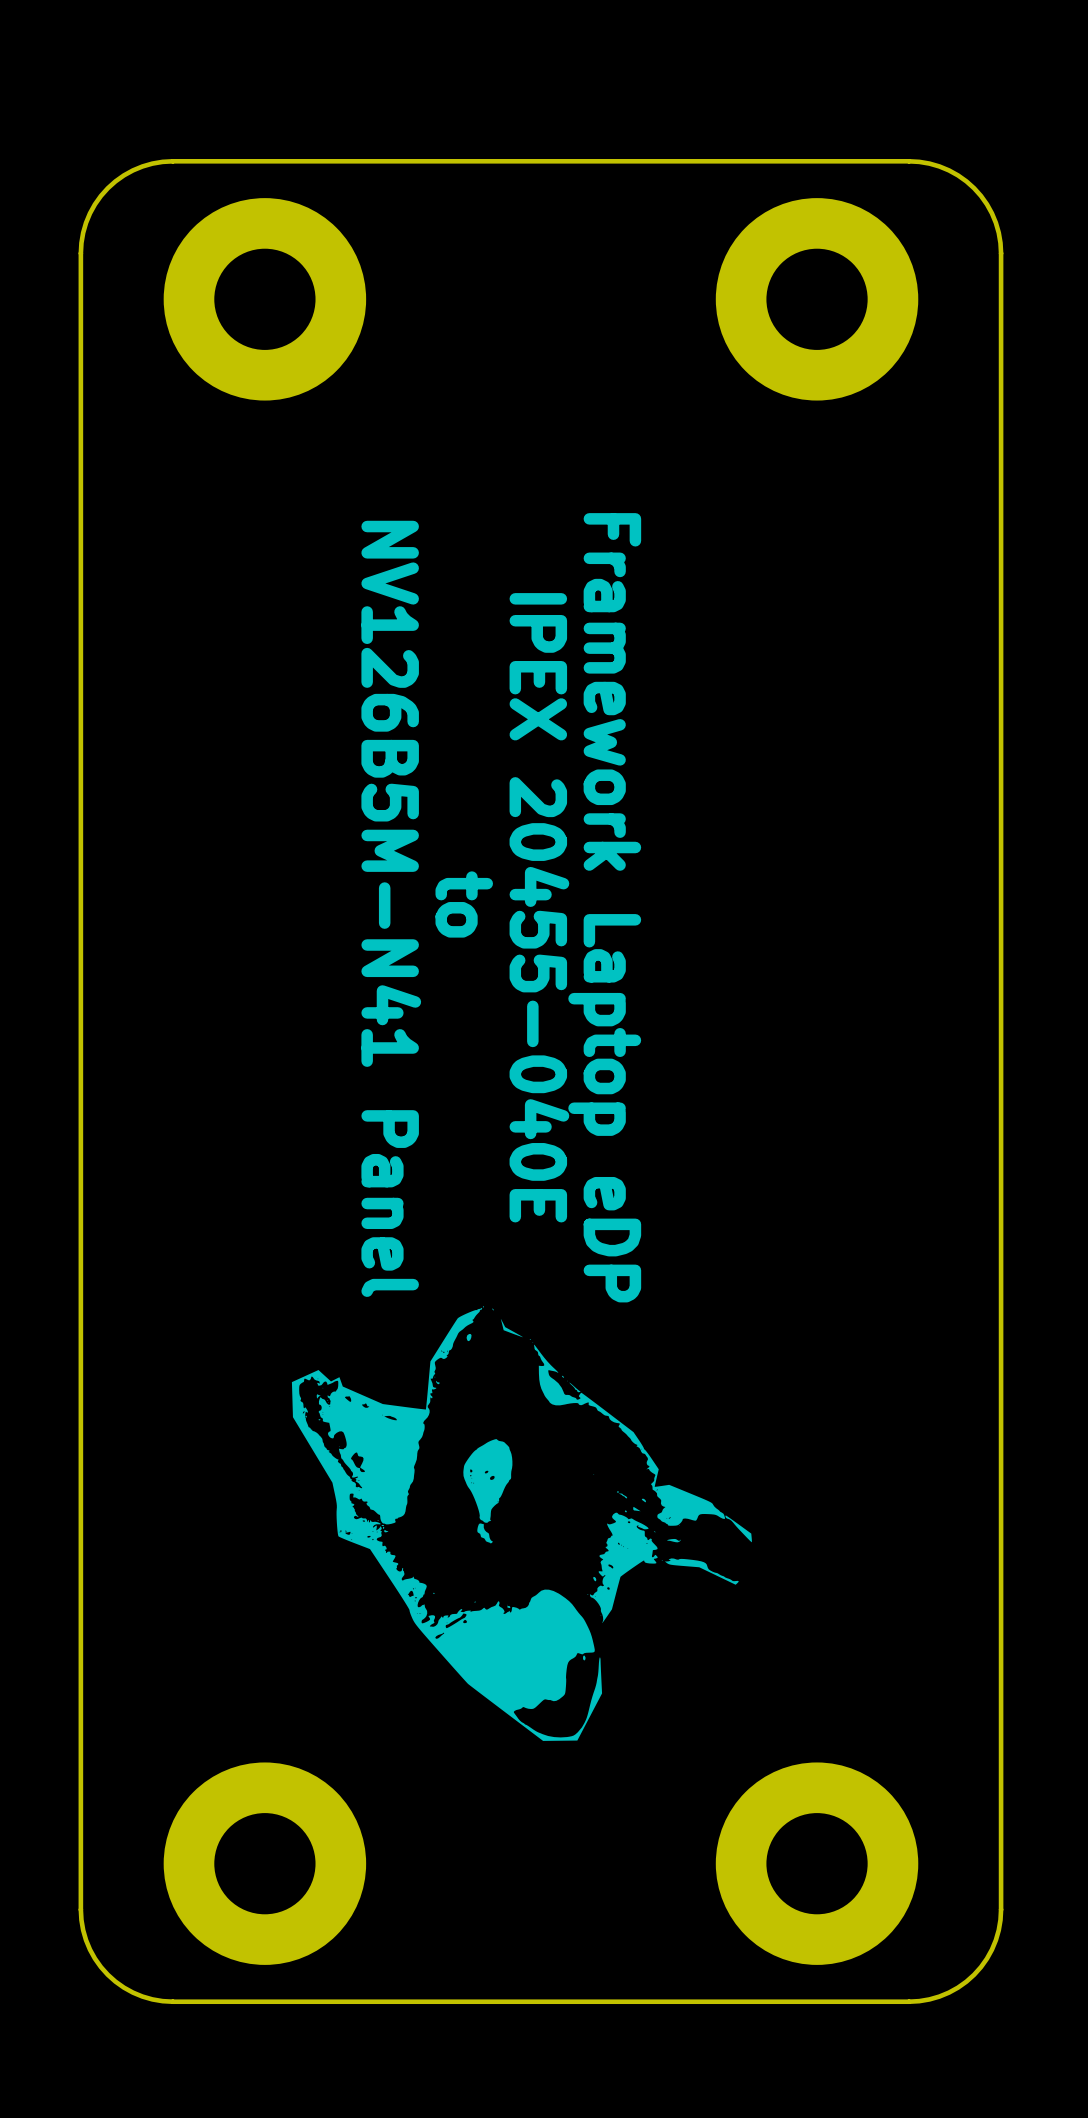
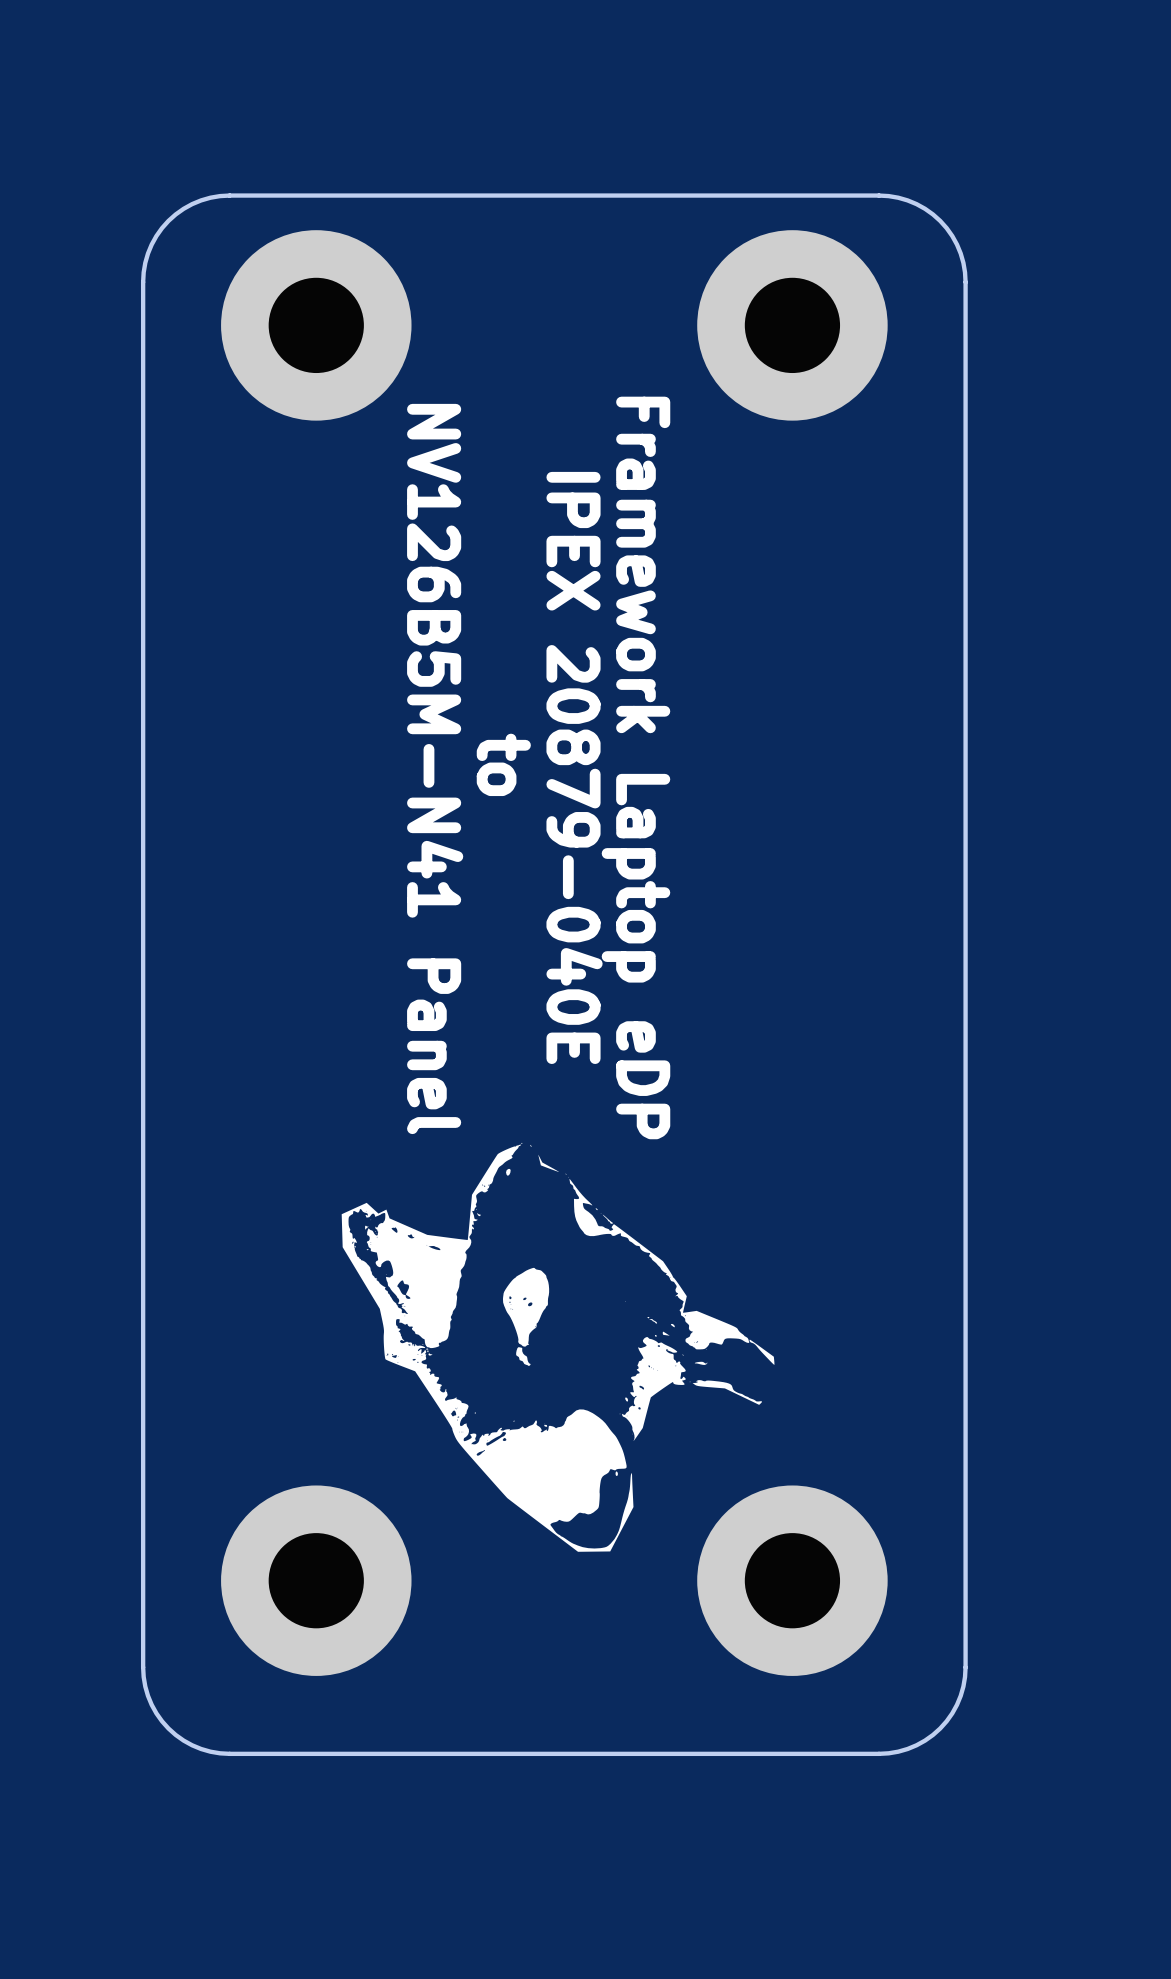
part position: (264, 299) -> (316, 325)
part position: (817, 299) -> (792, 325)
board edge: (80, 391) (80, 253) (86, 222) (100, 195) (115, 181) (142, 166) (162, 161) (919, 161) (948, 170) (974, 188) (991, 213) (1000, 243) (1001, 1909) (998, 1930) (986, 1958) (966, 1981) (948, 1992) (929, 1999) (909, 2001) (162, 2001) (142, 1996) (123, 1987) (107, 1974) (94, 1958) (86, 1940) (81, 1920) (80, 1863) -> (143, 282) (145, 262) (151, 244) (168, 220) (192, 204) (210, 197) (229, 195) (888, 196) (916, 204) (940, 220) (957, 244) (963, 262) (965, 282) (965, 1667) (960, 1695) (952, 1713) (940, 1728) (925, 1740) (898, 1751) (879, 1753) (220, 1753) (192, 1745) (175, 1734) (162, 1721) (147, 1695) (143, 1667)
text: IPEX 20455-040E (539, 907) -> IPEX 20879-040E (574, 767)
part position: (264, 1863) -> (316, 1580)
part position: (817, 1863) -> (792, 1580)

